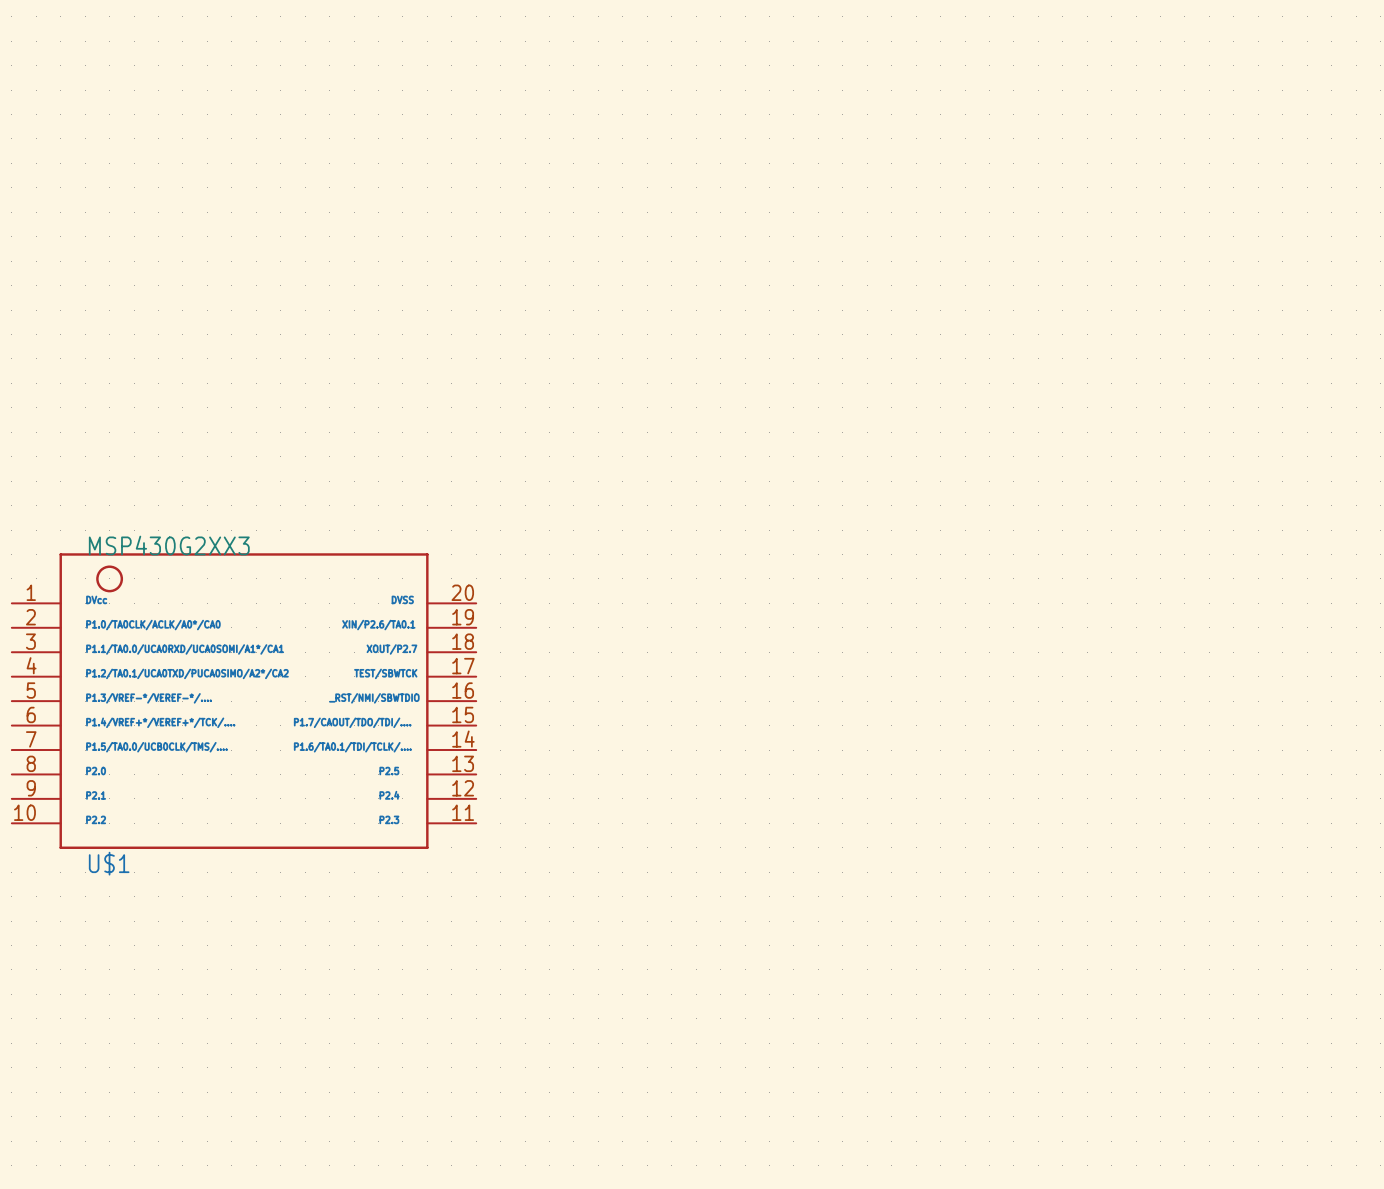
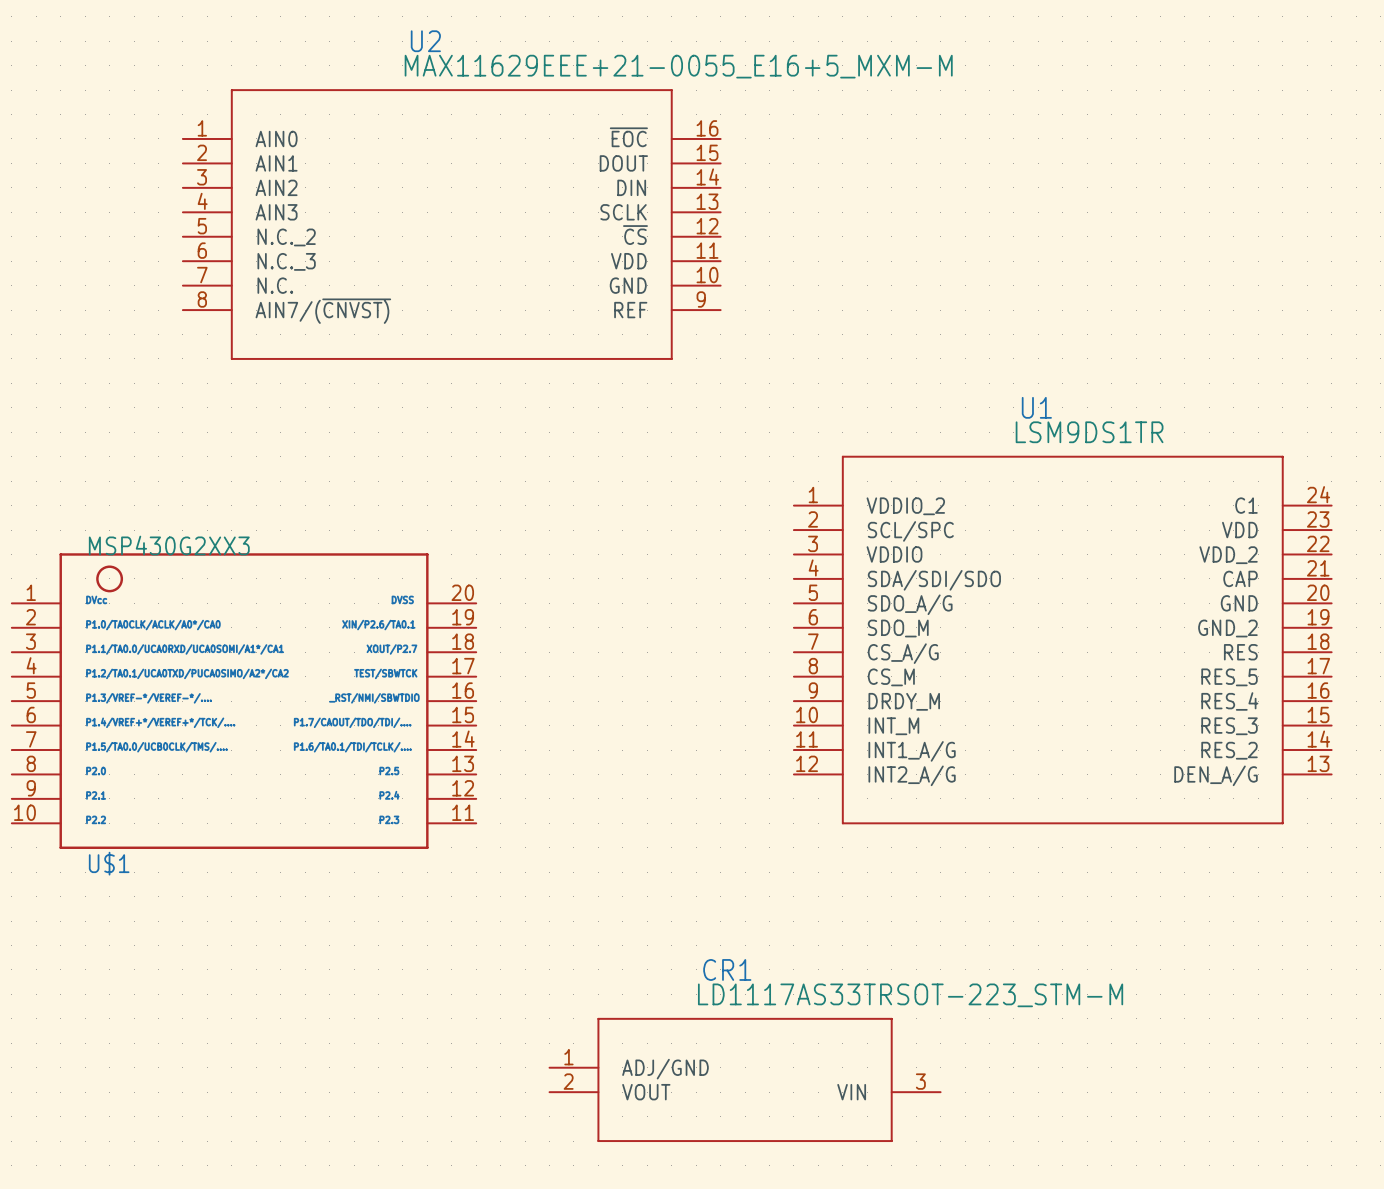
U2: none -> MAX11629EEE+21-0055_E16+5_MXM-M (451, 224)
U1: none -> LSM9DS1TR (1062, 640)
CR1: none -> LD1117AS33TRSOT-223_STM-M (745, 1079)

